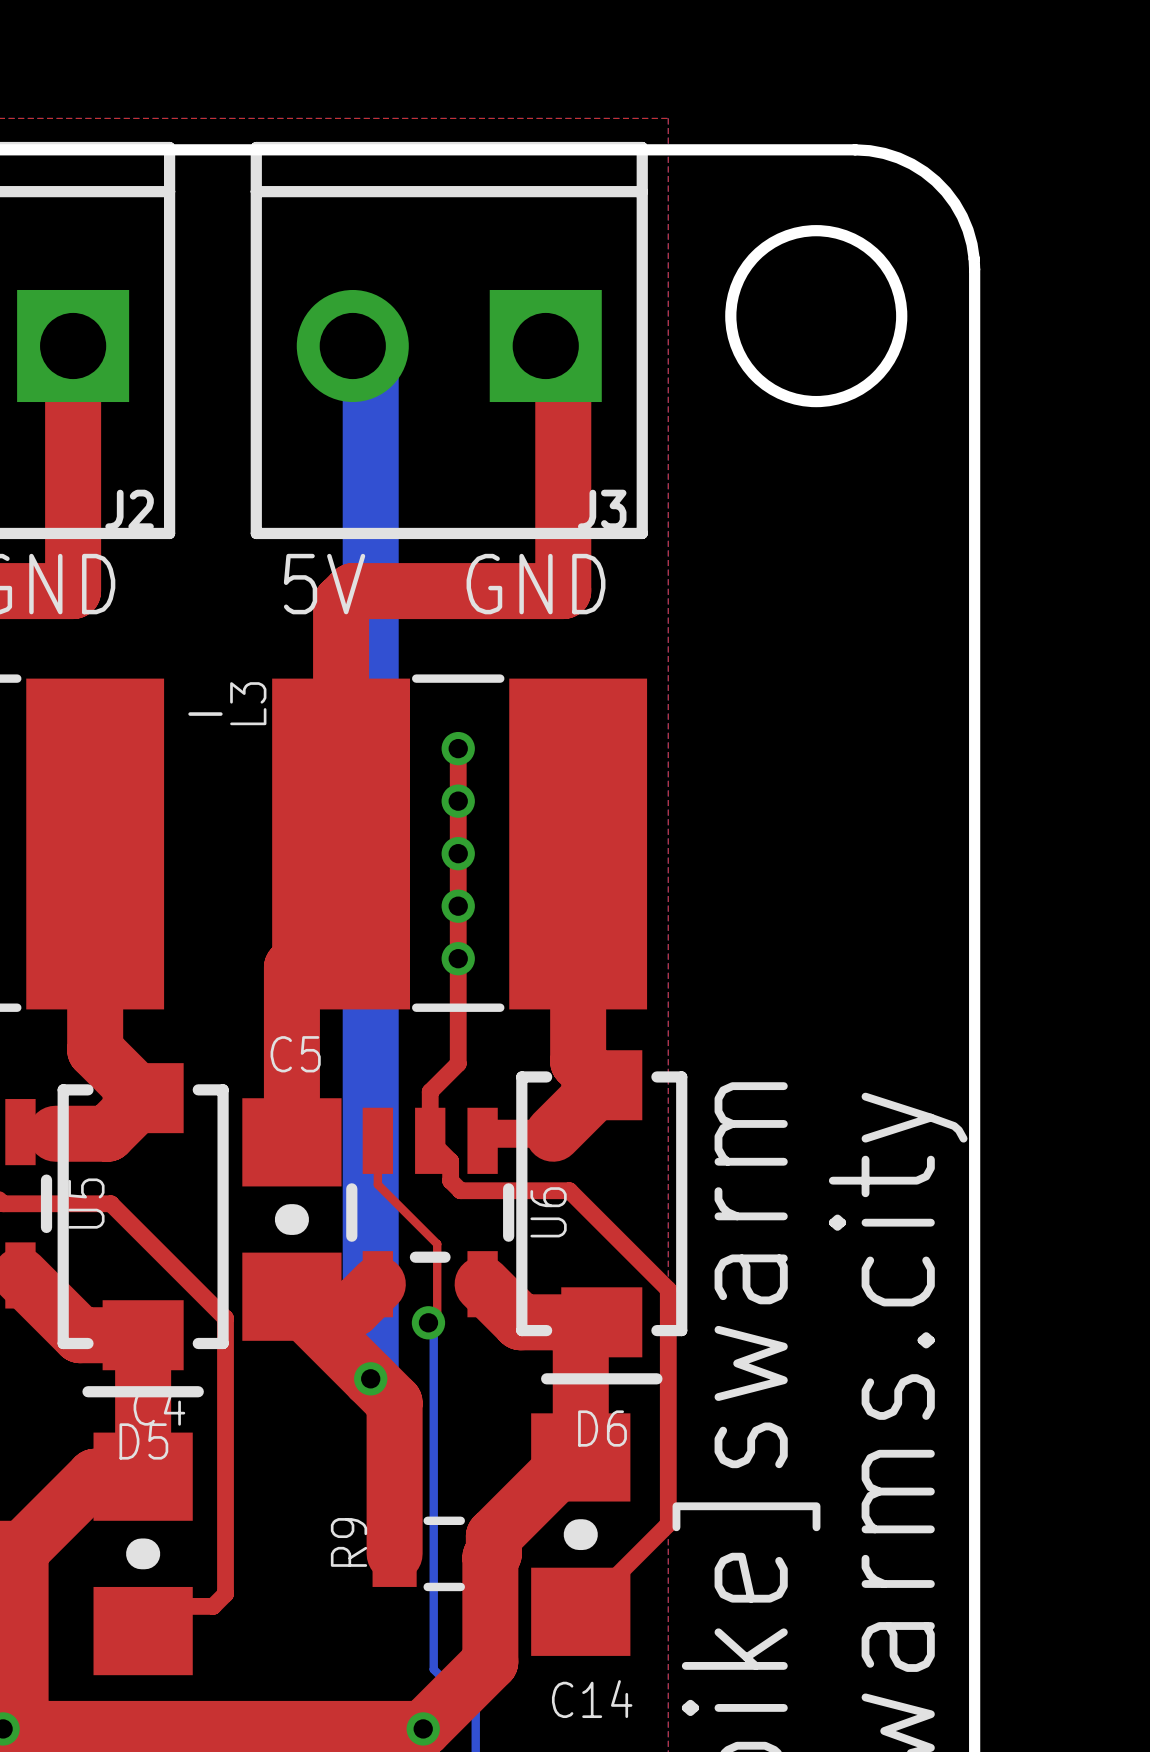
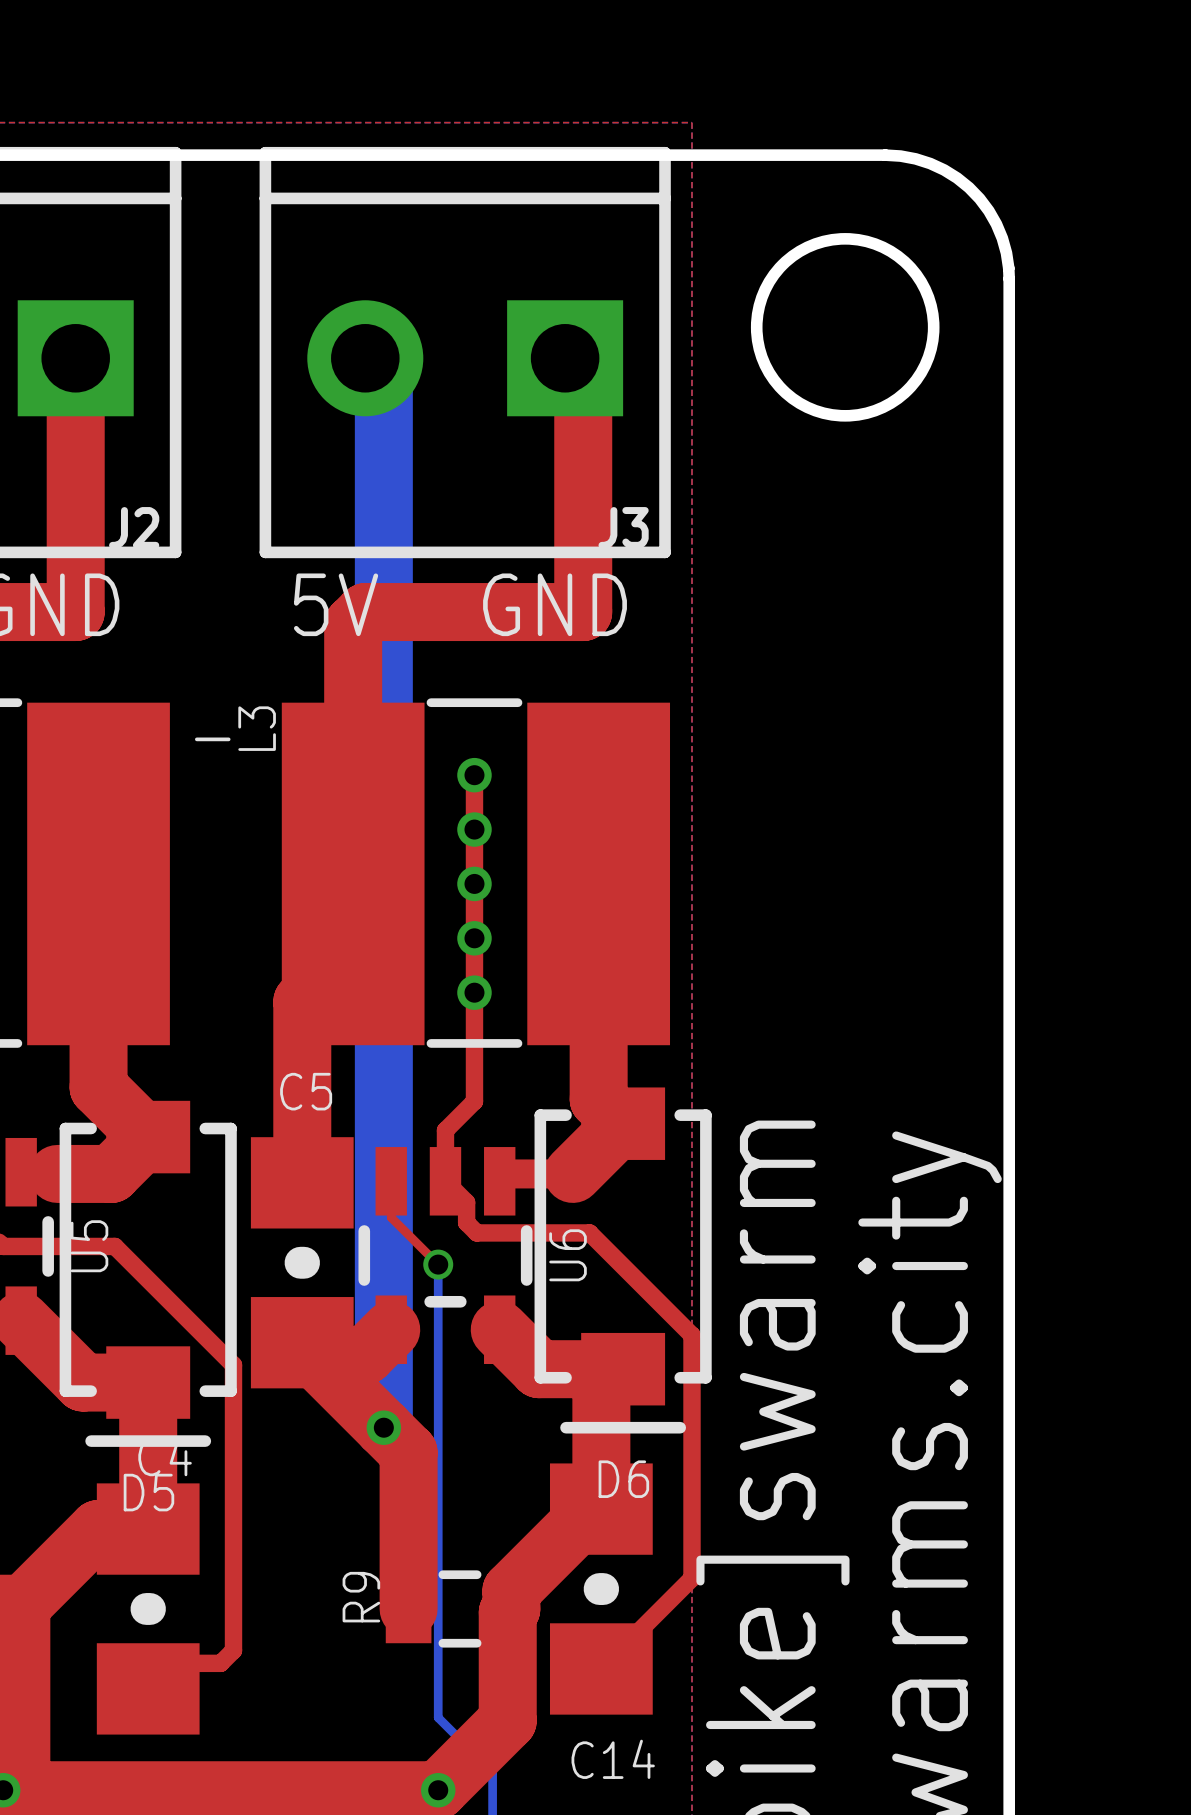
top track: (377, 1175) (377, 1184) (437, 1244) (437, 1314) (428, 1322) -> (391, 1217) (438, 1264)
via: none -> (438, 1264)
bottom track: (428, 1322) (433, 1328) (433, 1669) -> (438, 1264) (438, 1717) (449, 1728)
via: (428, 1322) -> none

